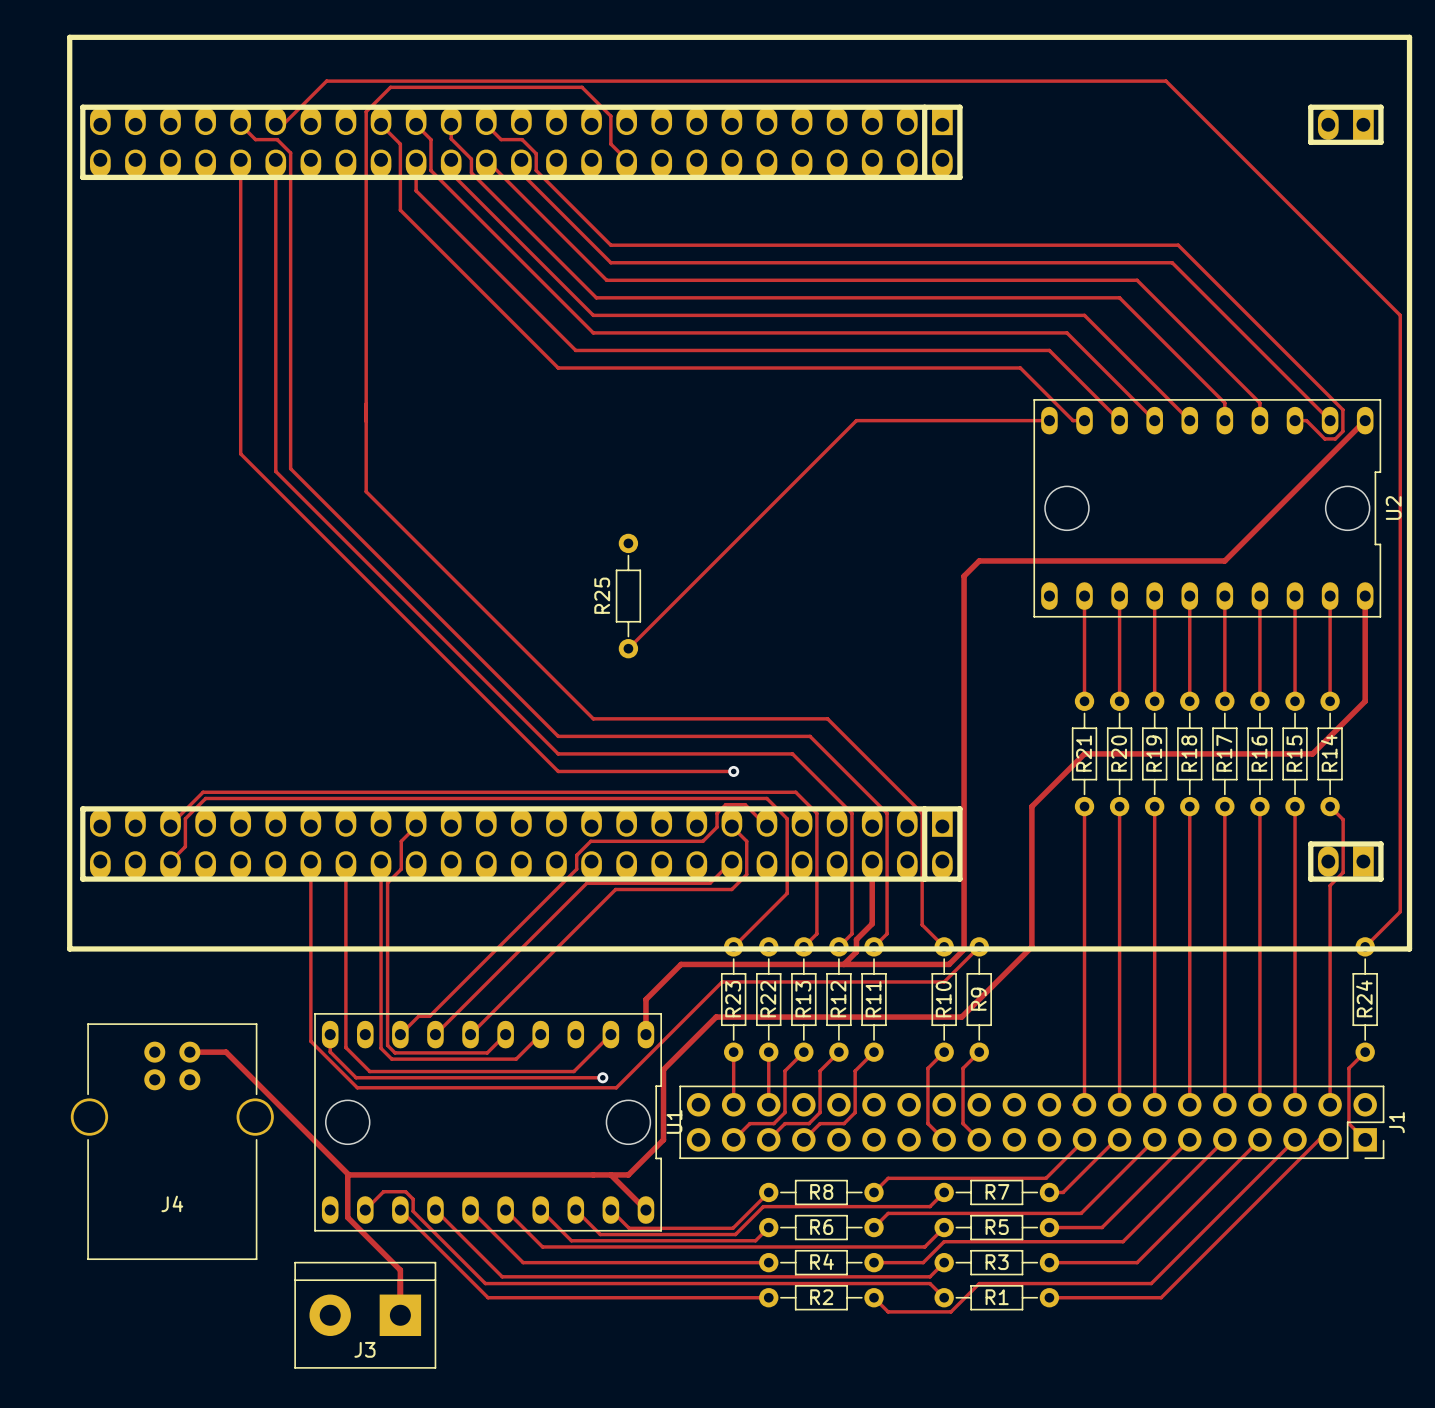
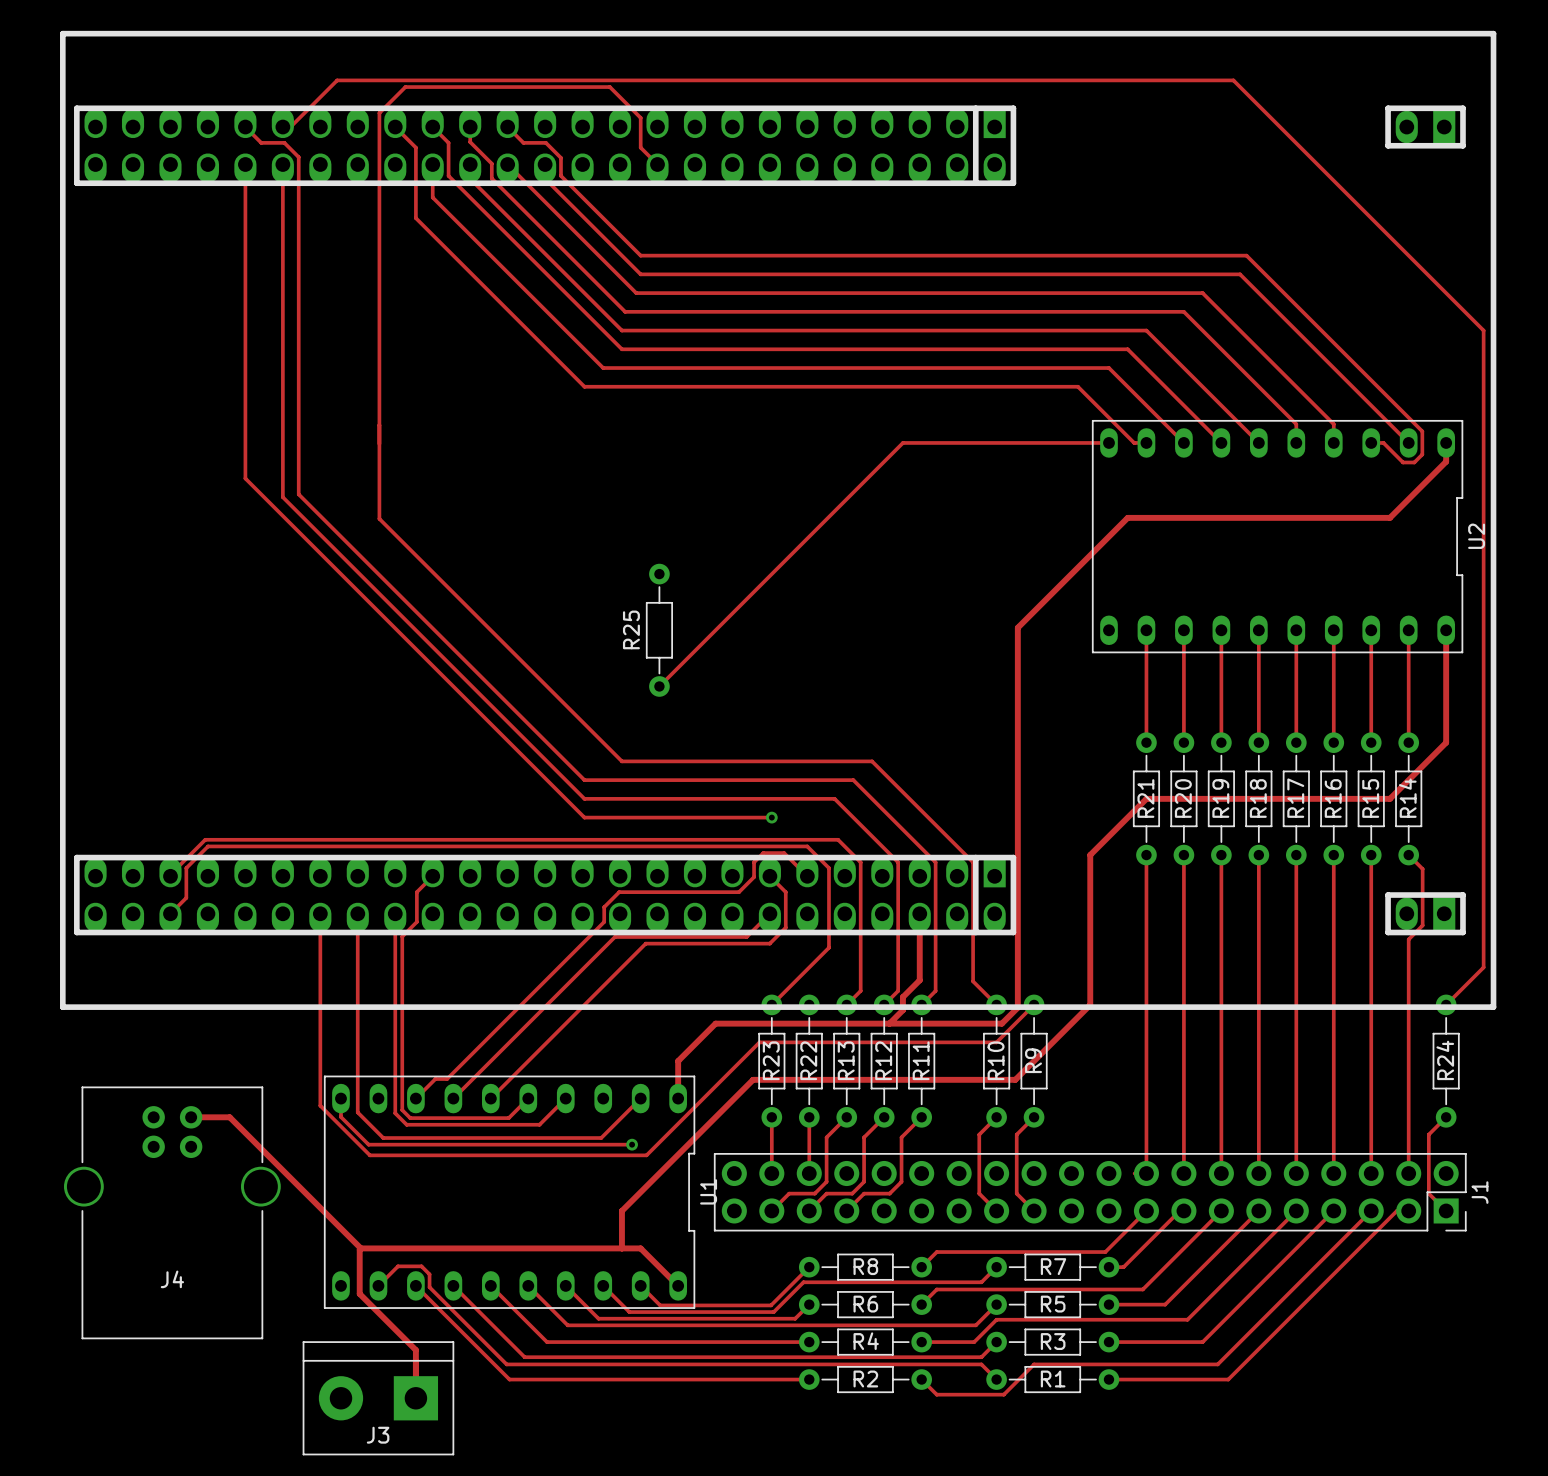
U2 footprint: [1033, 399, 1382, 618] -> [1091, 419, 1464, 654]
track: (1365, 420) (1224, 560) (979, 560) (964, 576) (964, 593) -> (1446, 442) (1446, 461) (1389, 517) (1127, 517) (1017, 627)
U1 footprint: [314, 1013, 662, 1232] -> [323, 1075, 696, 1309]
track: (663, 1069) (663, 1139) (628, 1174) (610, 1174) -> (696, 1136) (621, 1210) (621, 1248)

